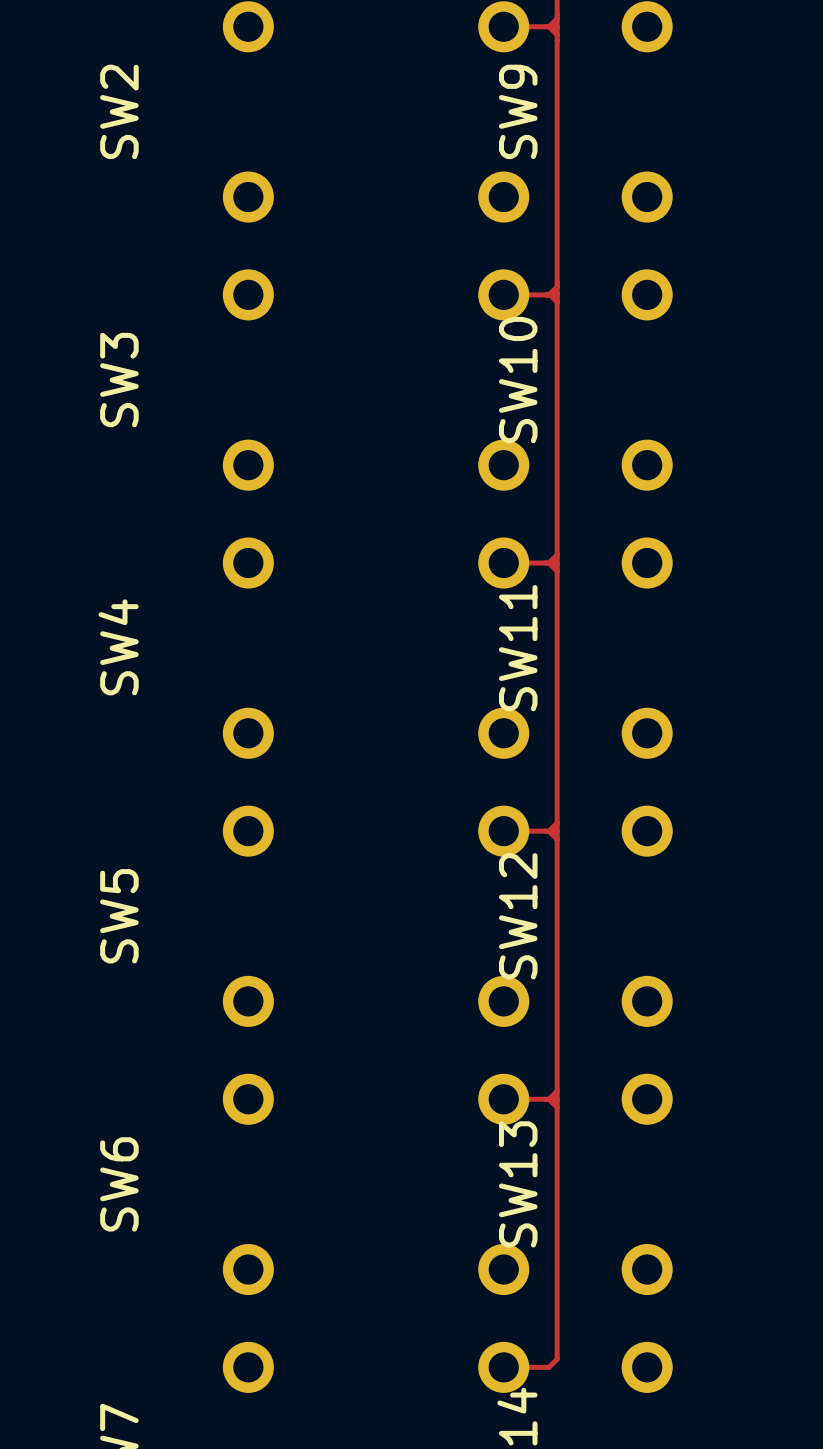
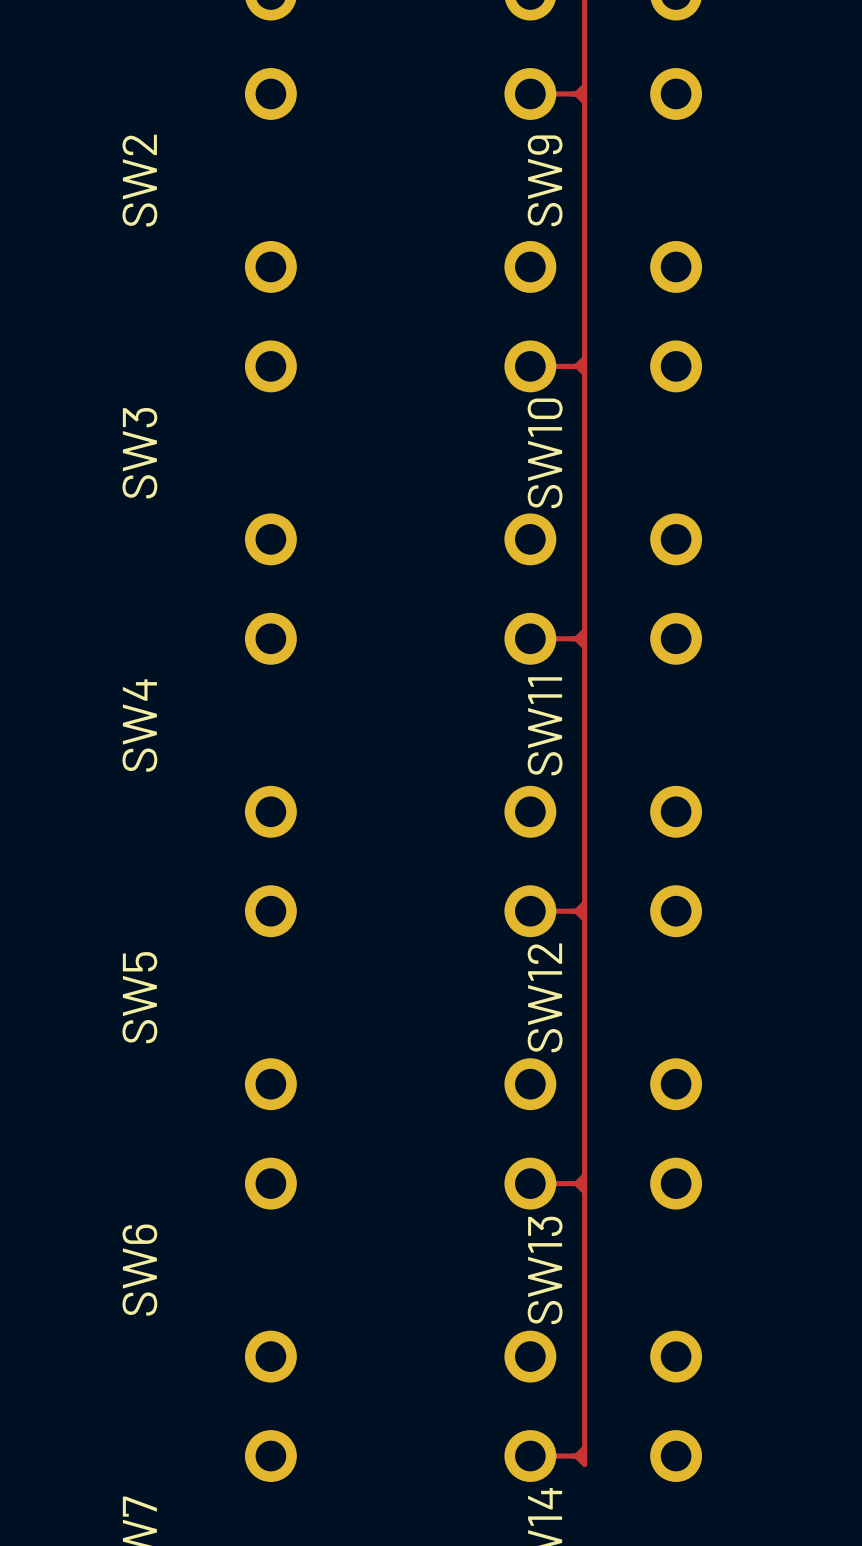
track: none -> (584, 1447) (584, 1464) (576, 1456) (584, 1456)

